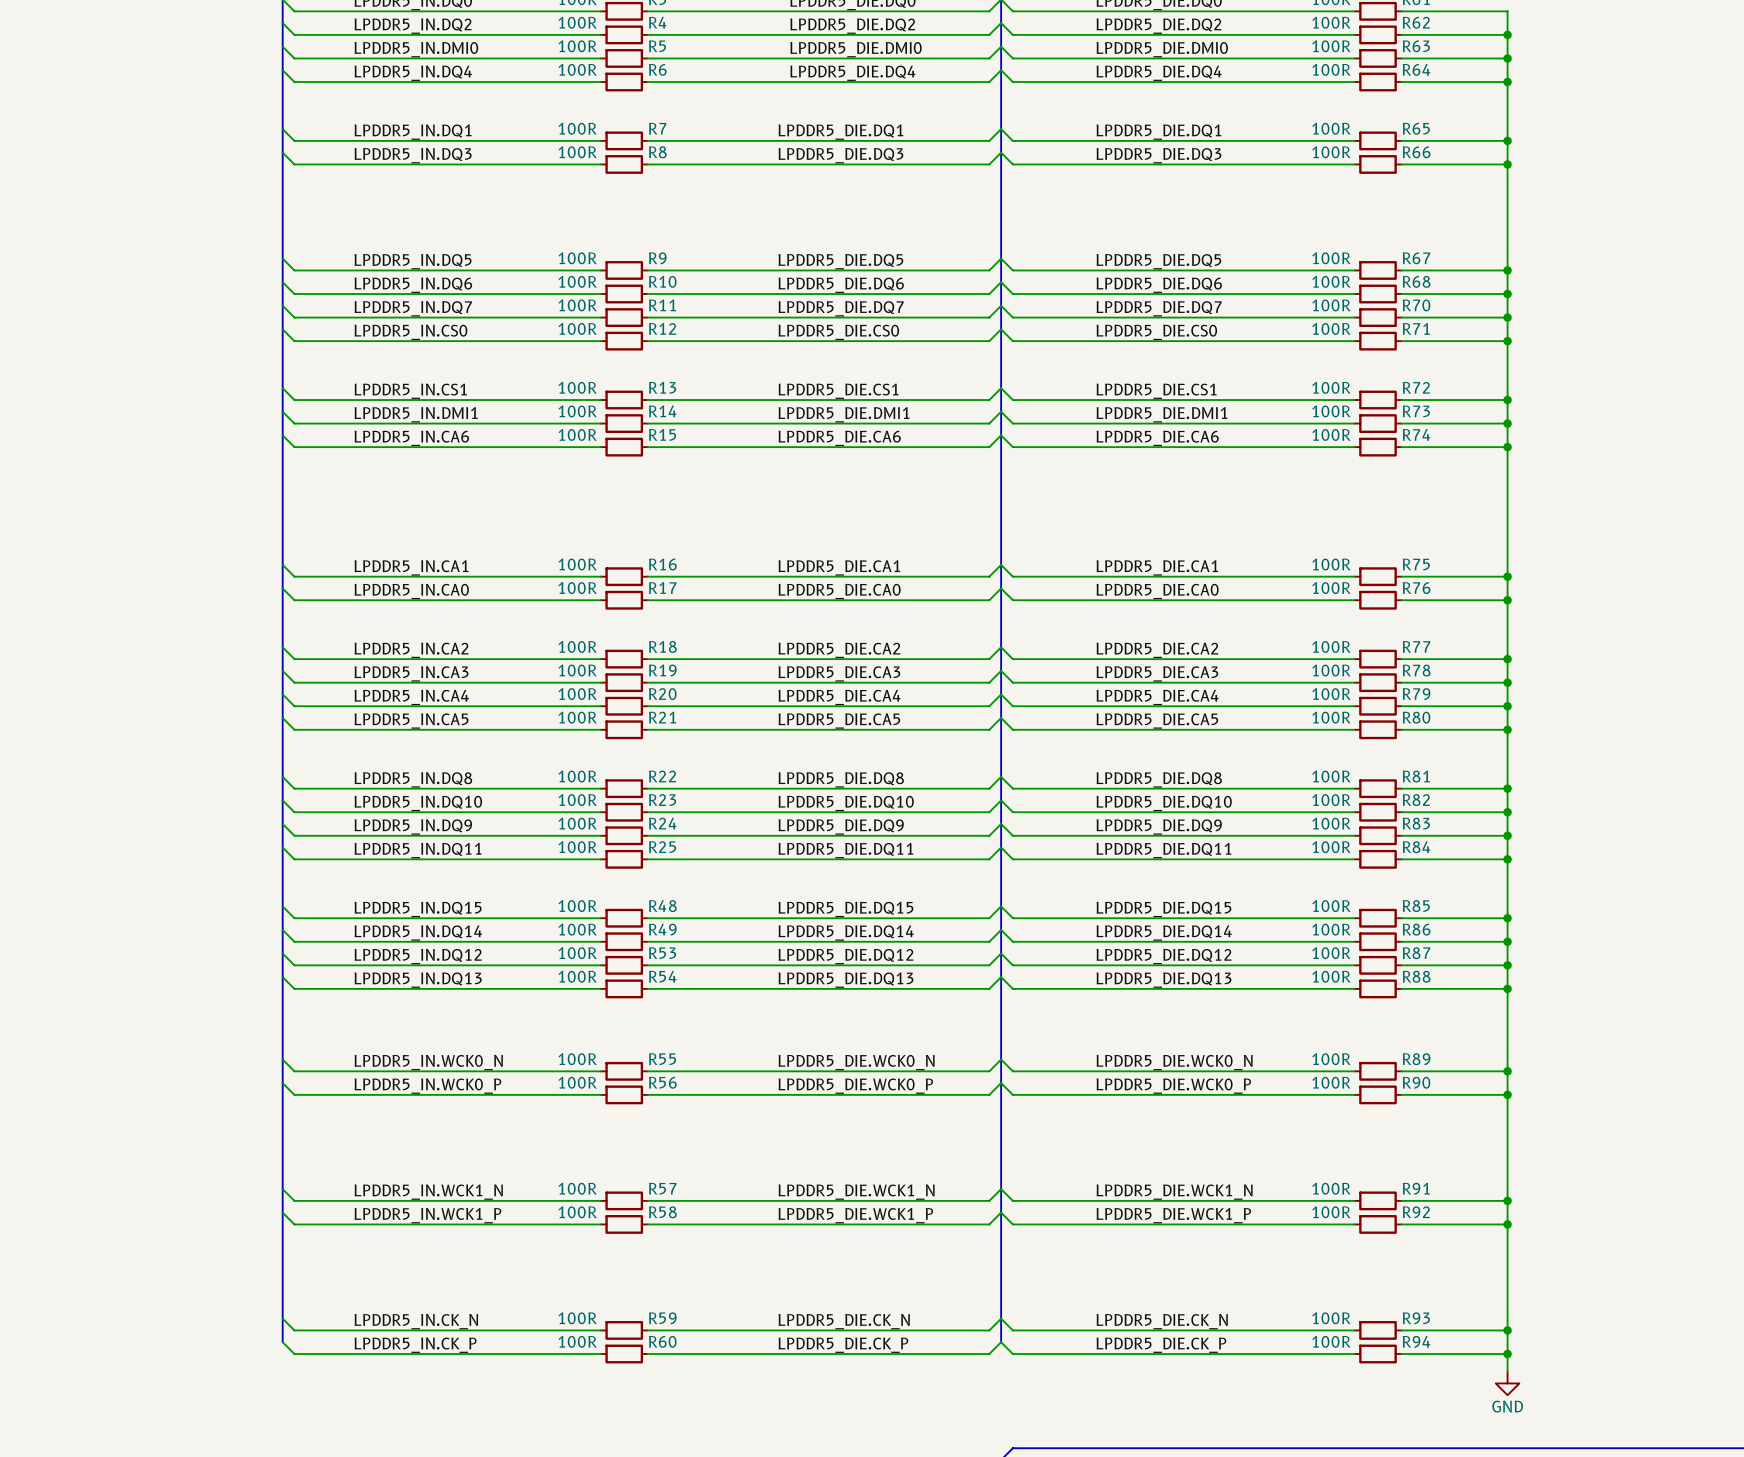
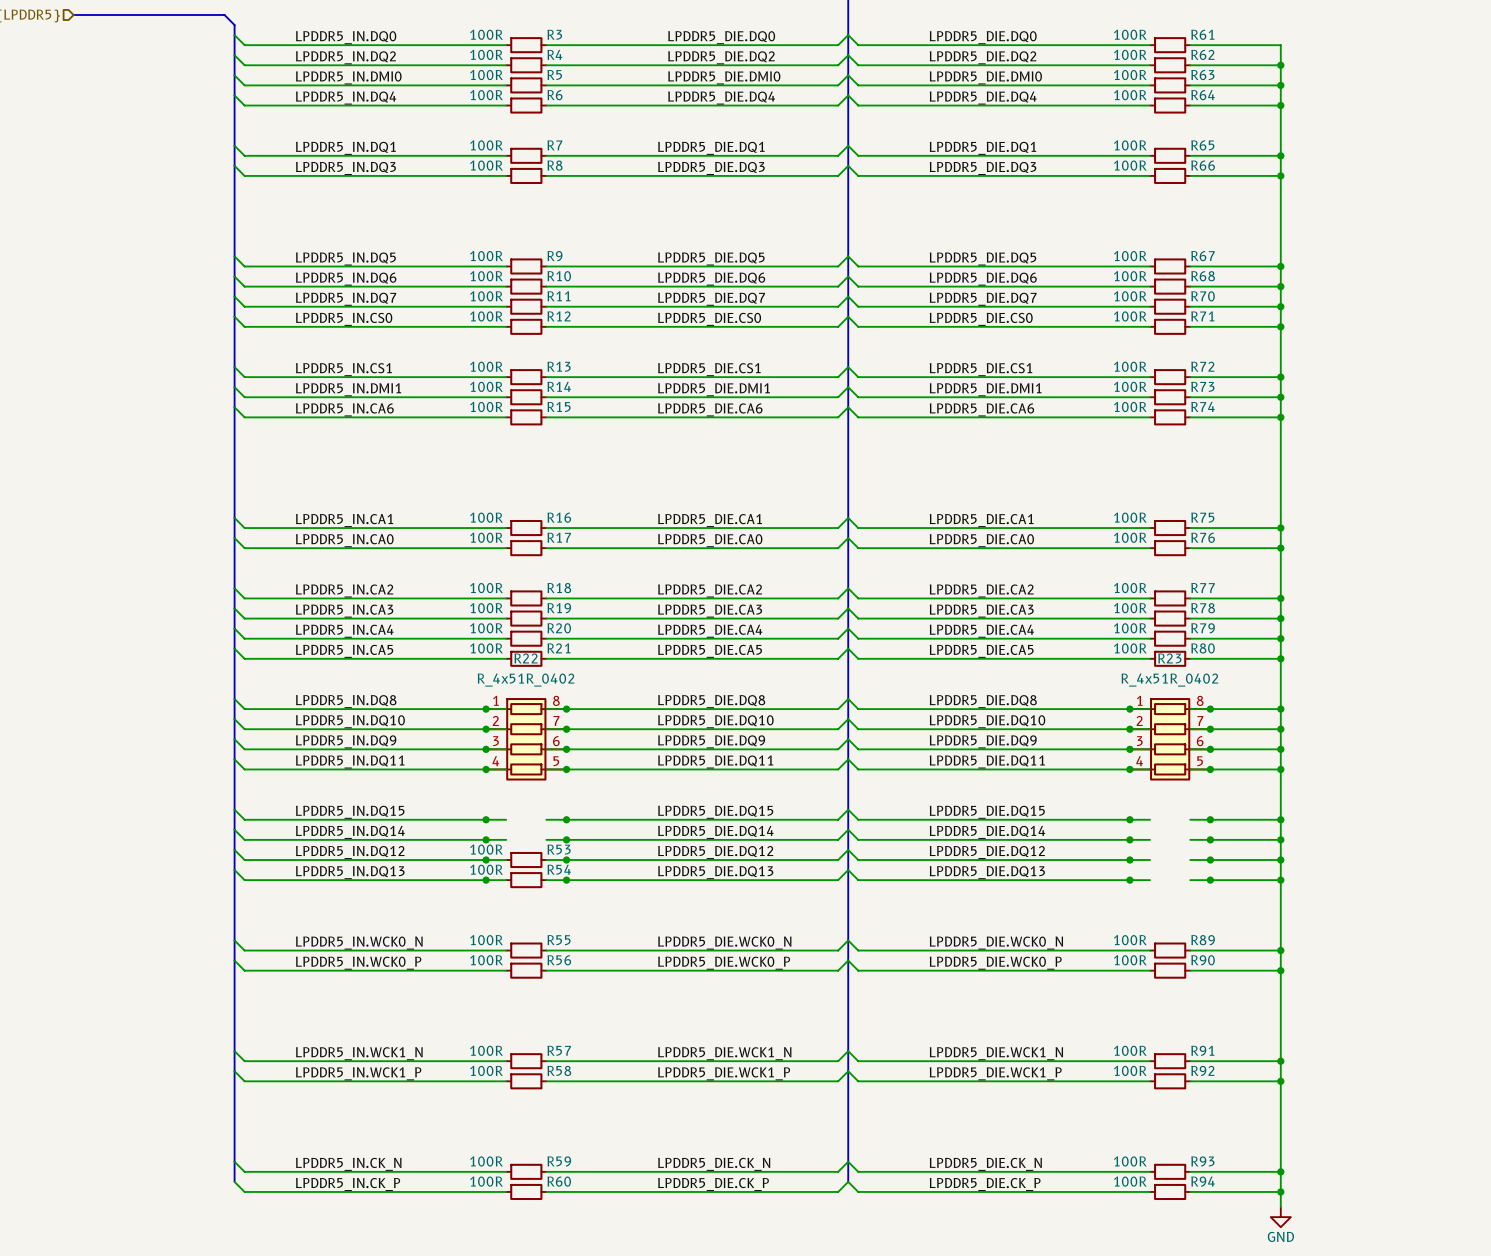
R22 text: 100R (577, 776) -> R_4x51R_0402 (526, 680)
R22 name position: R22 (662, 776) -> R22 (526, 658)
R22 symbol: [600, 779, 648, 799] -> [486, 698, 567, 781]
junction: none -> (486, 709)
junction: none -> (566, 709)
junction: none -> (1129, 709)
R81: (1378, 788) -> none
junction: none -> (1210, 709)
R23 text: 100R (577, 800) -> R_4x51R_0402 (1169, 680)
R23 name position: R23 (662, 800) -> R23 (1169, 658)
R23 symbol: [600, 802, 648, 822] -> [1129, 698, 1211, 781]
junction: none -> (486, 729)
junction: none -> (566, 729)
junction: none -> (1129, 729)
R82: (1378, 812) -> none
junction: none -> (1210, 729)
junction: none -> (486, 749)
R24: (624, 835) -> none
junction: none -> (566, 749)
junction: none -> (1129, 749)
R83: (1378, 835) -> none
junction: none -> (1210, 749)
junction: none -> (486, 769)
R25: (624, 859) -> none
junction: none -> (566, 769)
junction: none -> (1129, 769)
R84: (1378, 859) -> none
junction: none -> (1210, 769)
junction: none -> (486, 819)
R48: (624, 918) -> none
junction: none -> (566, 819)
junction: none -> (1129, 819)
R85: (1378, 918) -> none
junction: none -> (1210, 819)
junction: none -> (486, 839)
R49: (624, 941) -> none
junction: none -> (566, 839)
junction: none -> (1129, 839)
R86: (1378, 941) -> none
junction: none -> (1210, 839)
junction: none -> (486, 860)
junction: none -> (566, 860)
junction: none -> (1129, 860)
R87: (1378, 965) -> none
junction: none -> (1210, 860)
junction: none -> (486, 880)
junction: none -> (566, 880)
junction: none -> (1129, 880)
R88: (1378, 988) -> none
junction: none -> (1210, 880)

